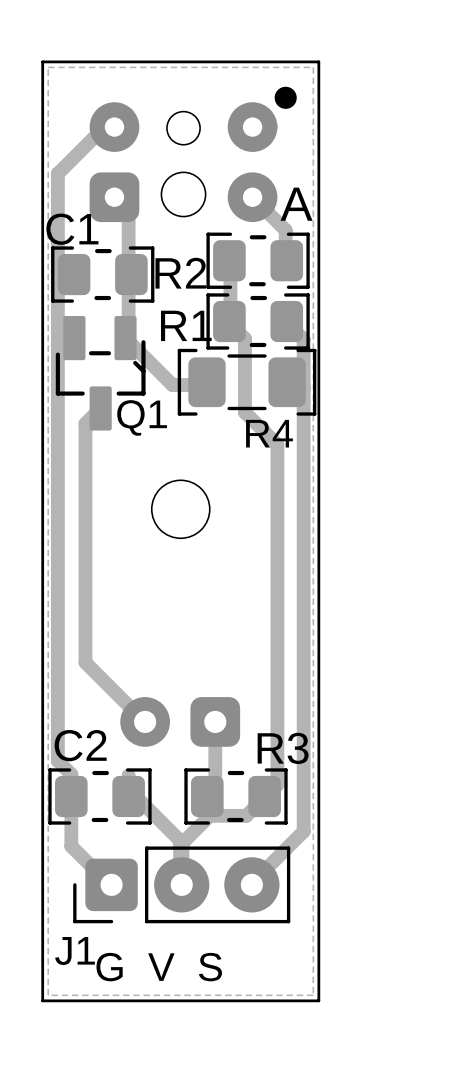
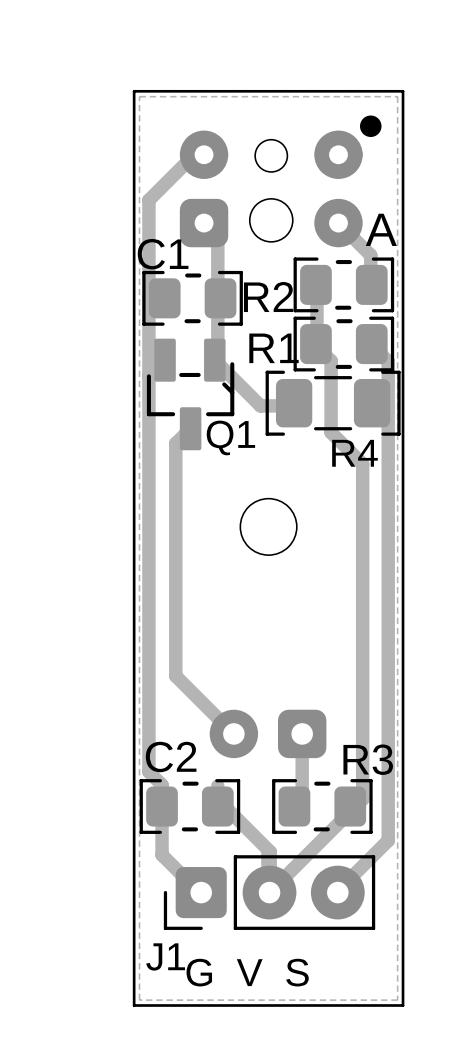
track: (277, 784) (246, 815) (209, 815) (180, 845) -> (362, 795) (362, 799) (269, 892)

